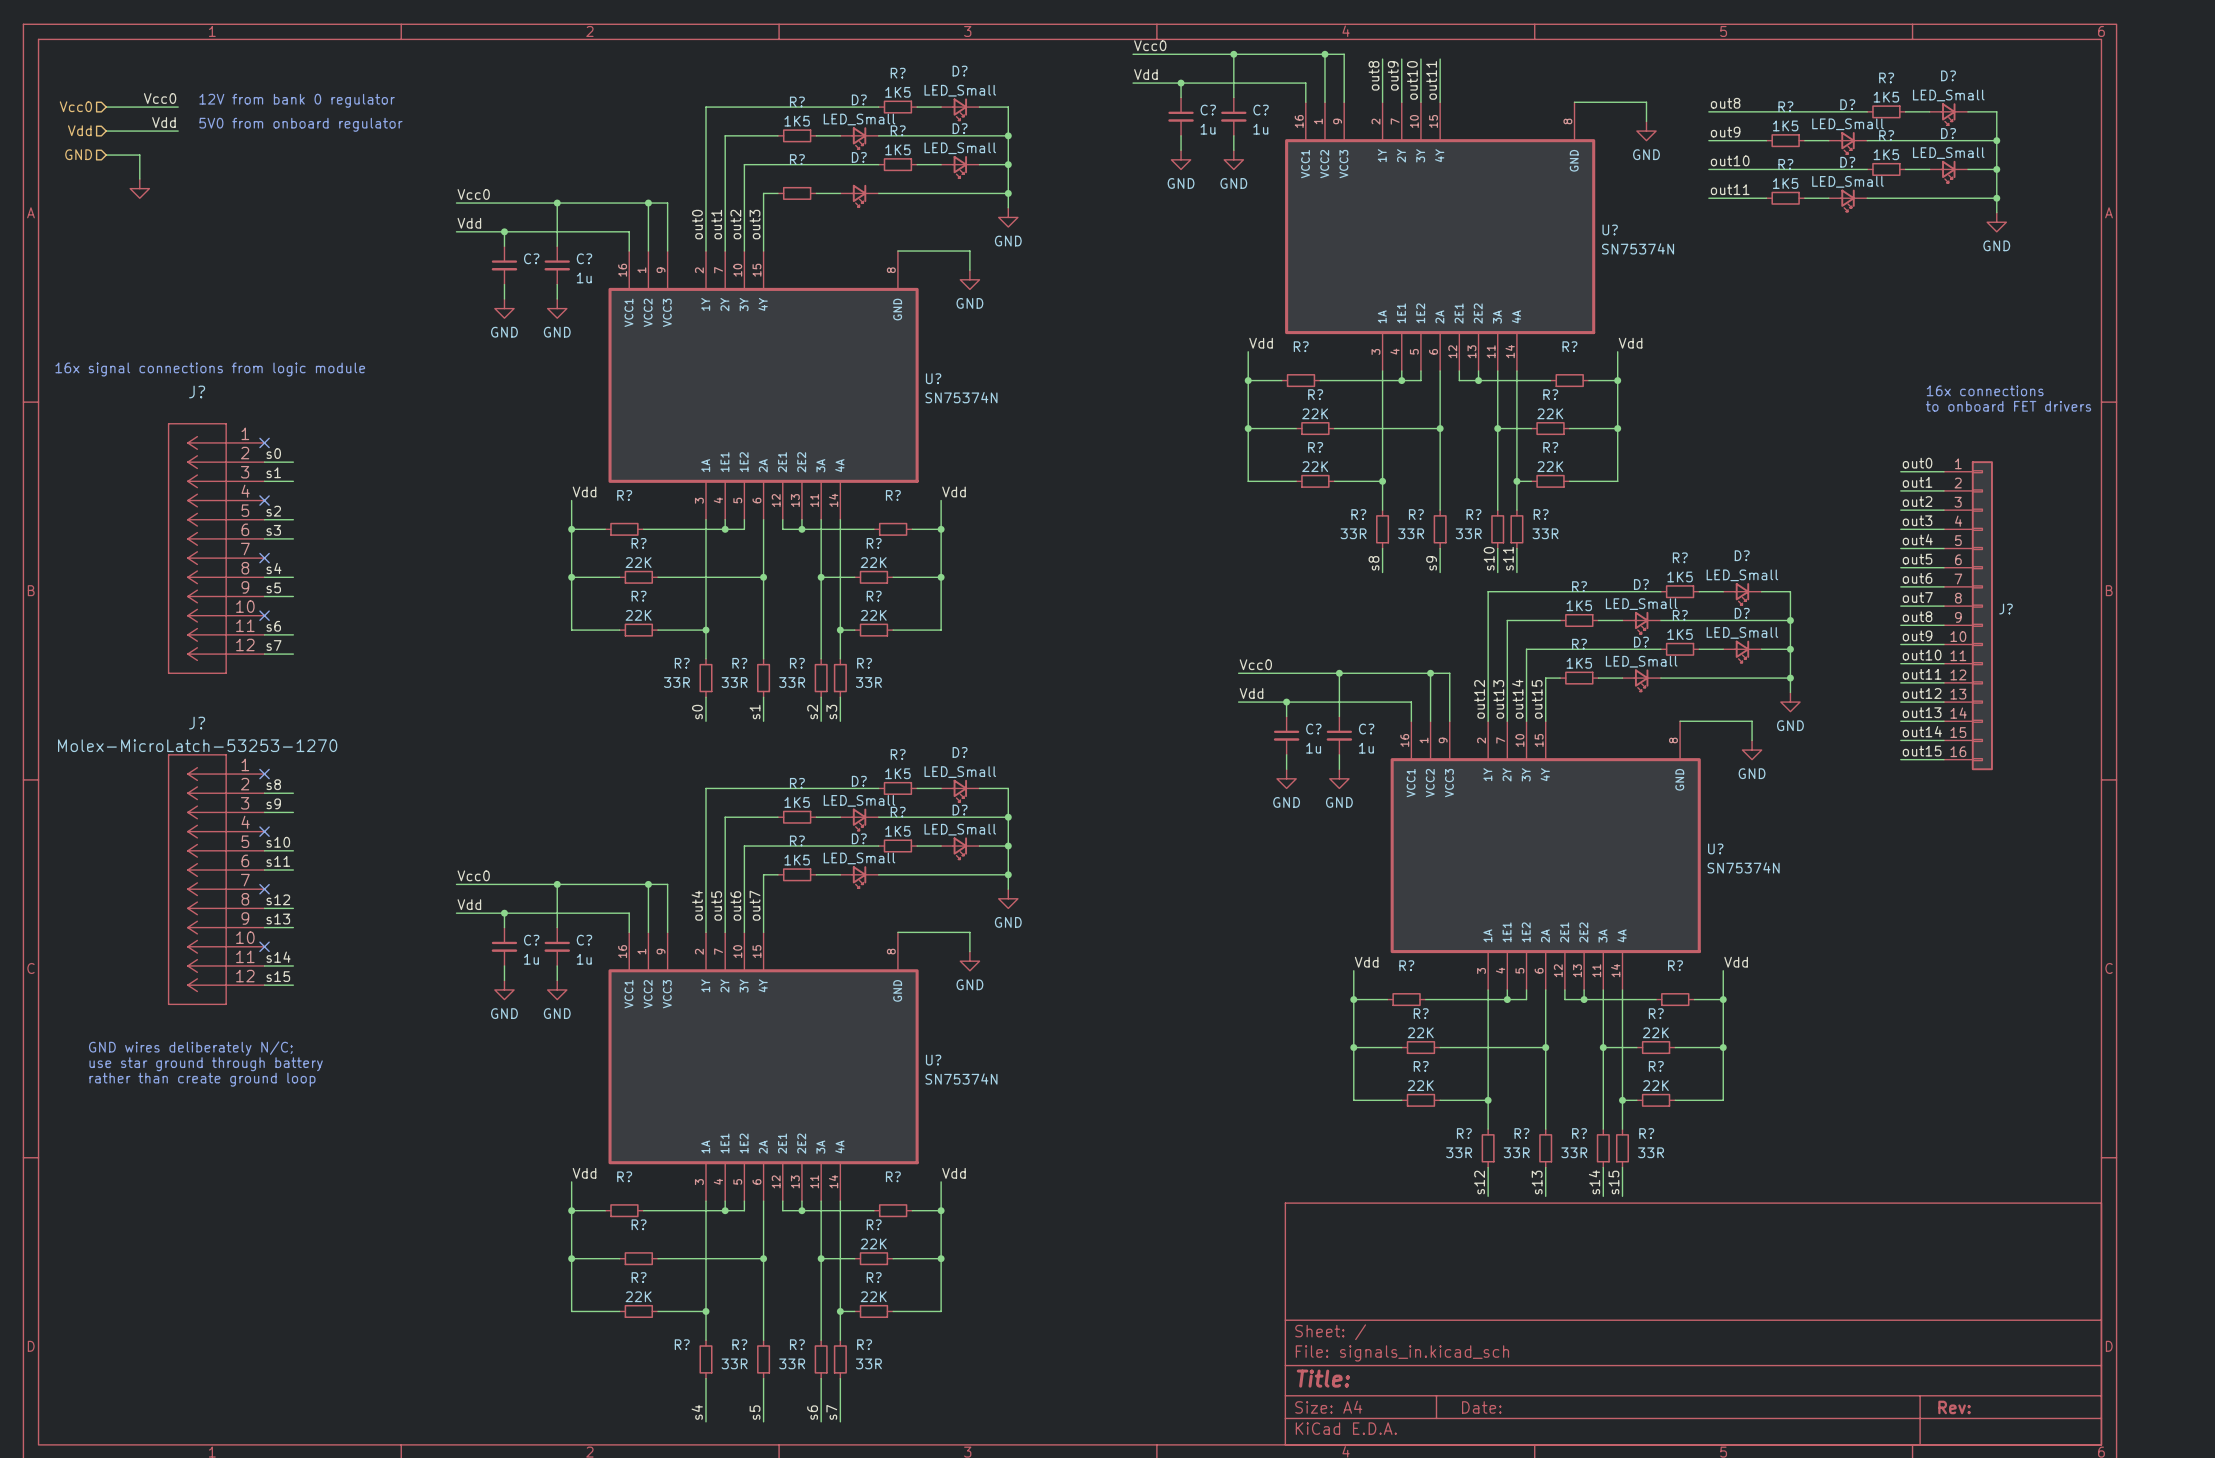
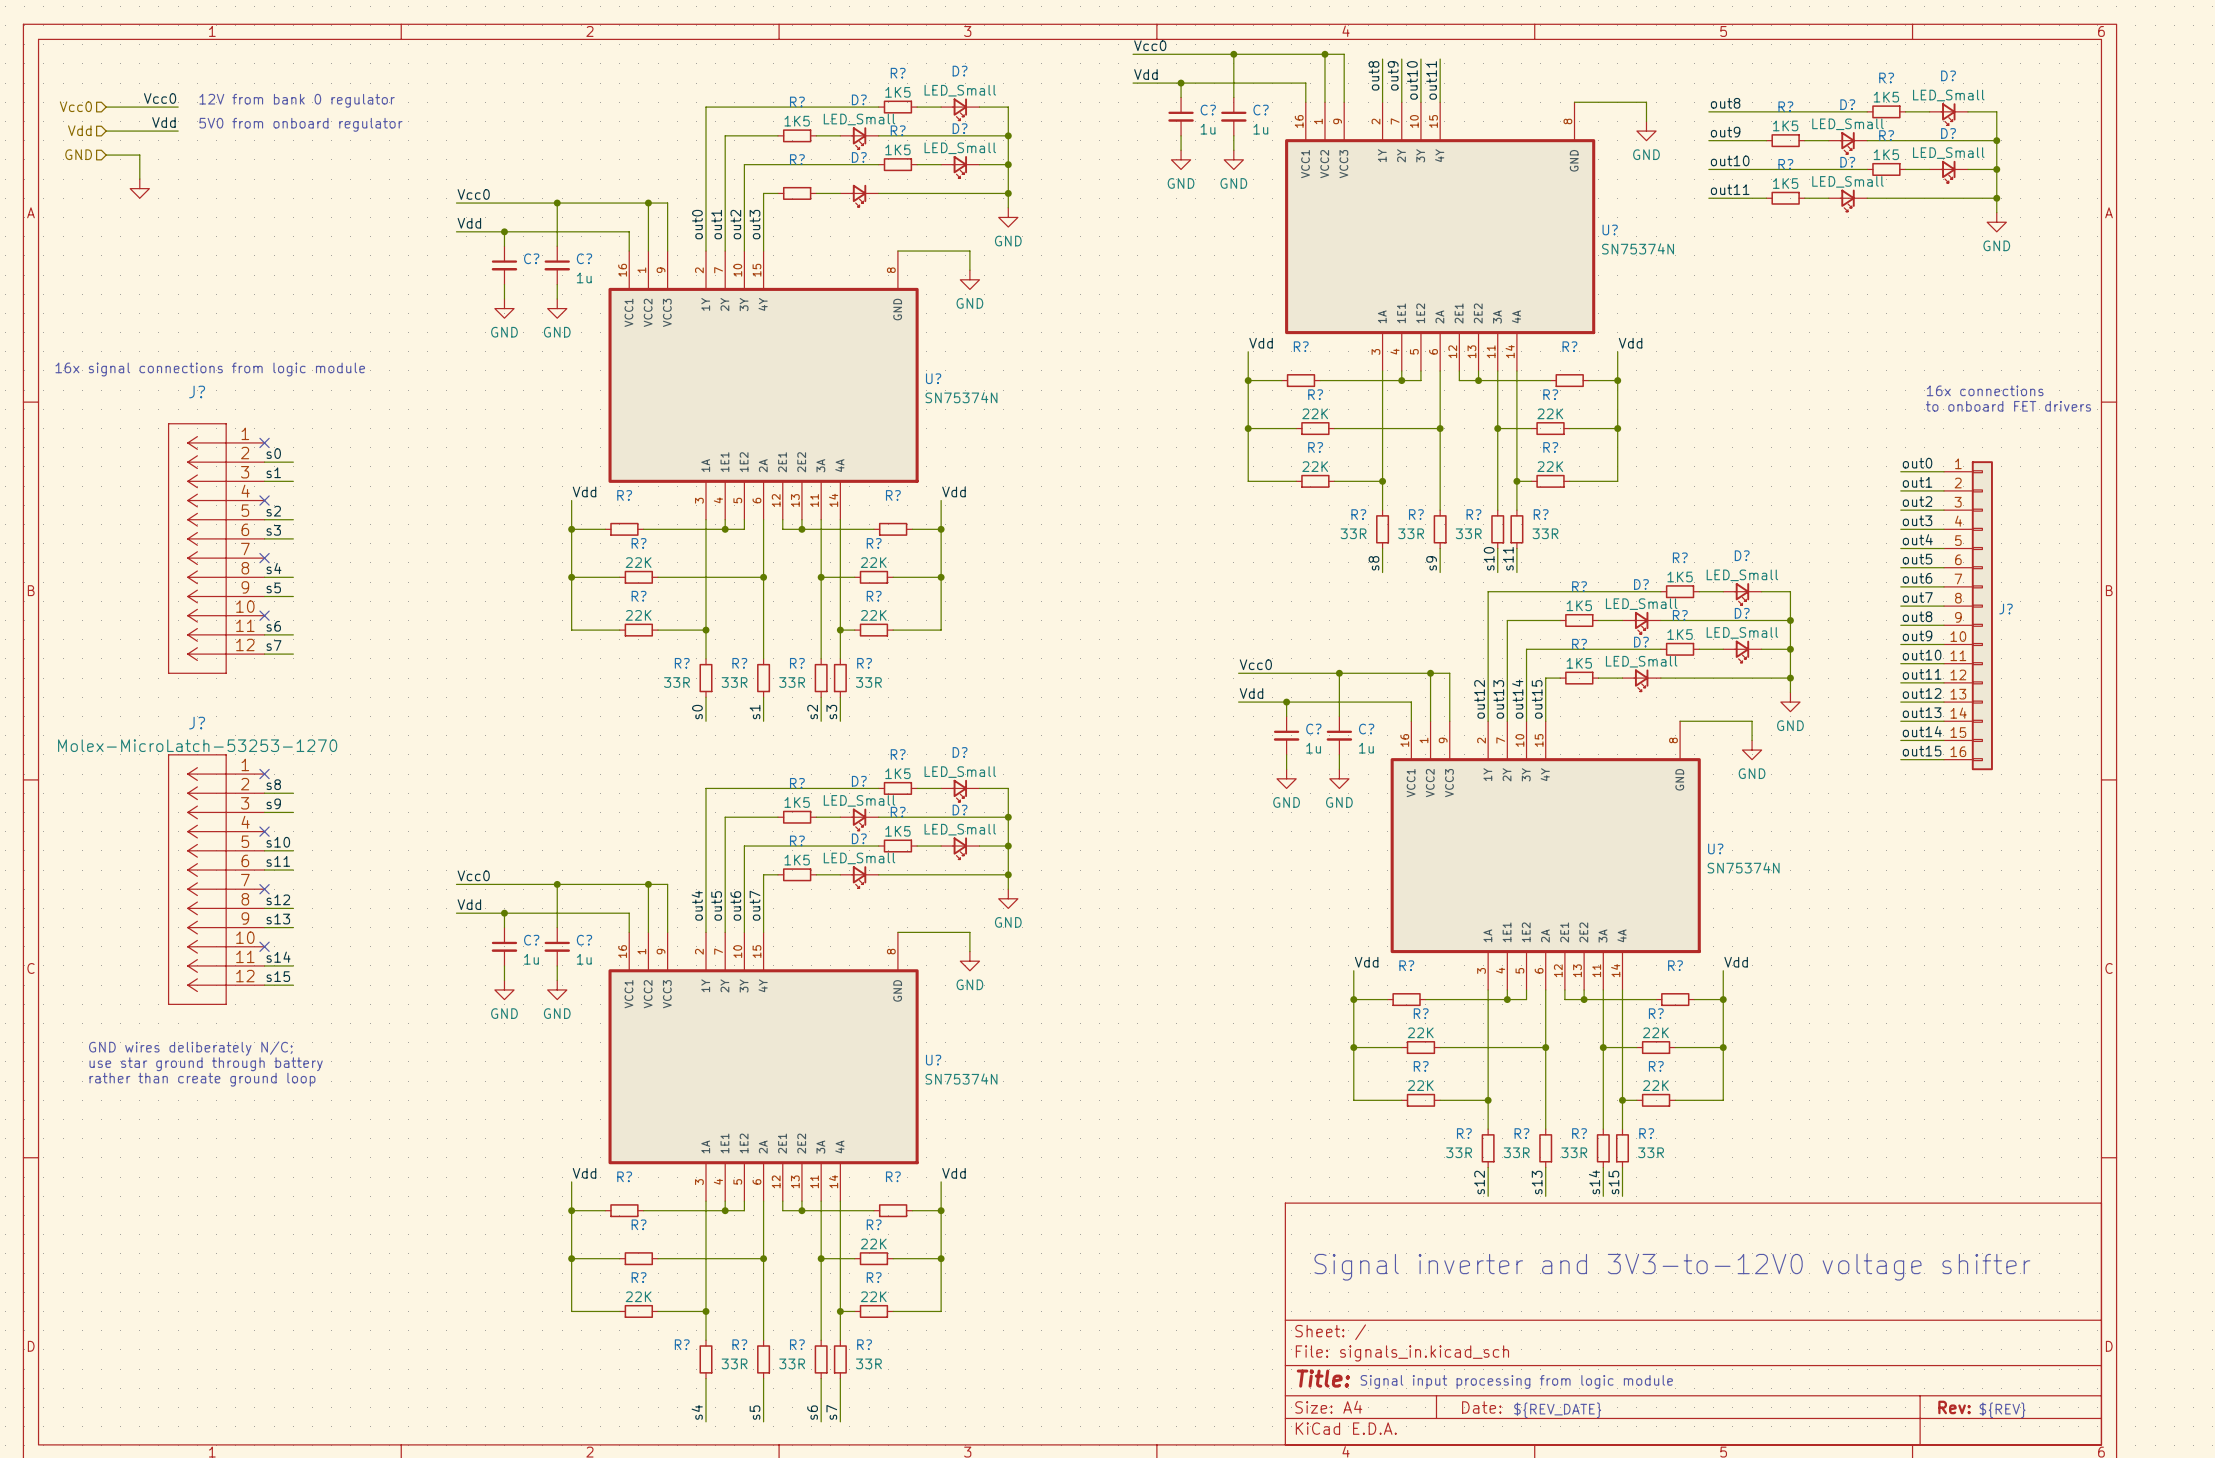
text: none -> Signal inverter and 3V3-to-12V0 voltage shifter (1672, 1267)
text: none -> Signal input processing from logic module (1516, 1381)
text: none -> ${REV_DATE} (1557, 1410)
text: none -> ${REV} (2002, 1410)

